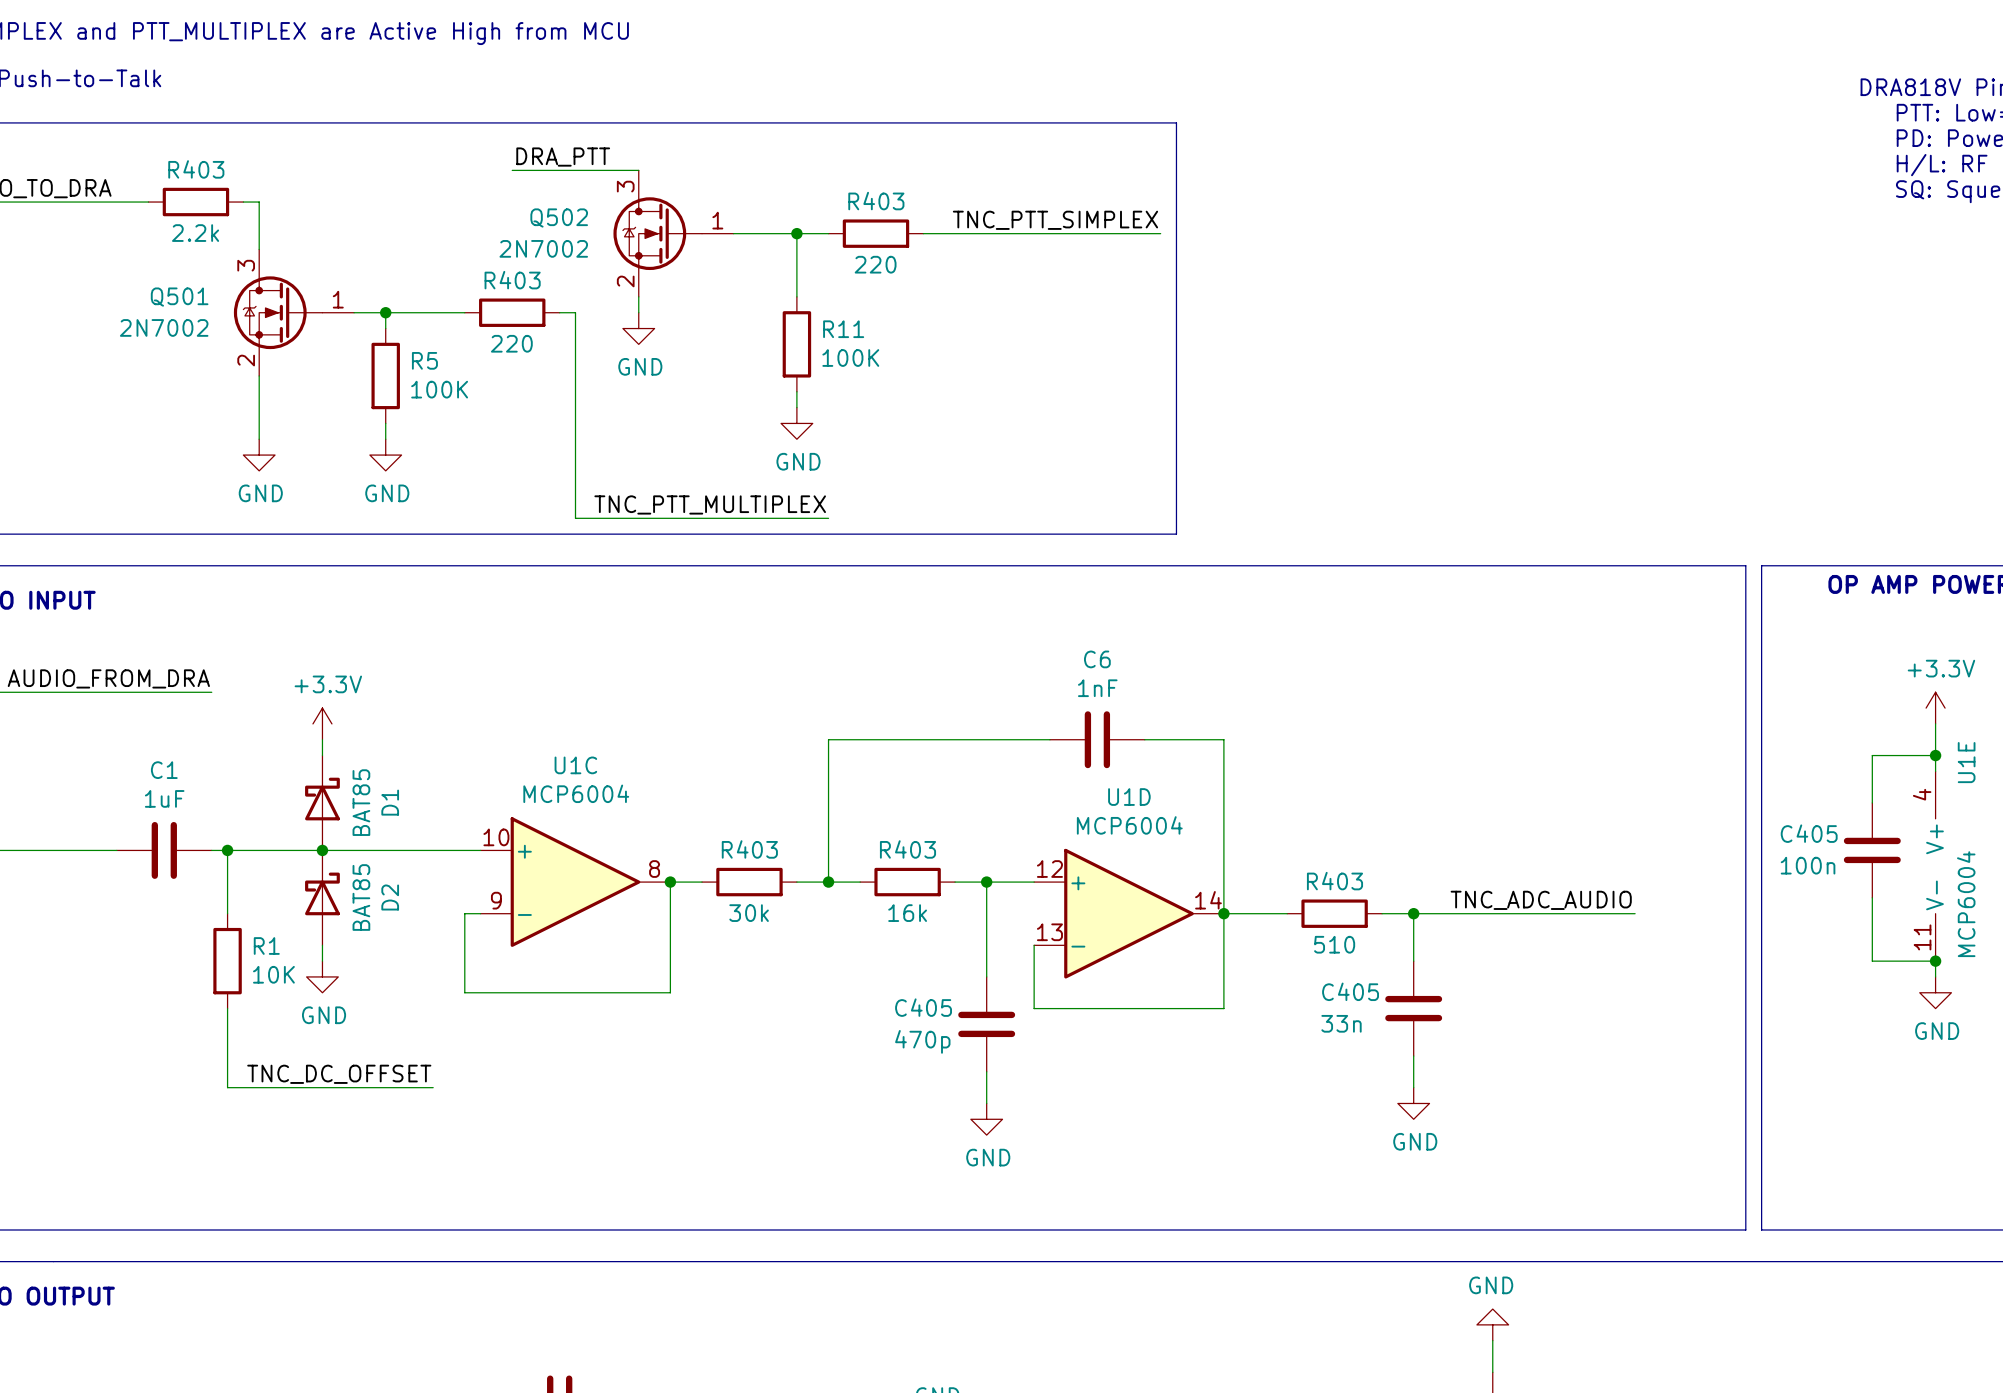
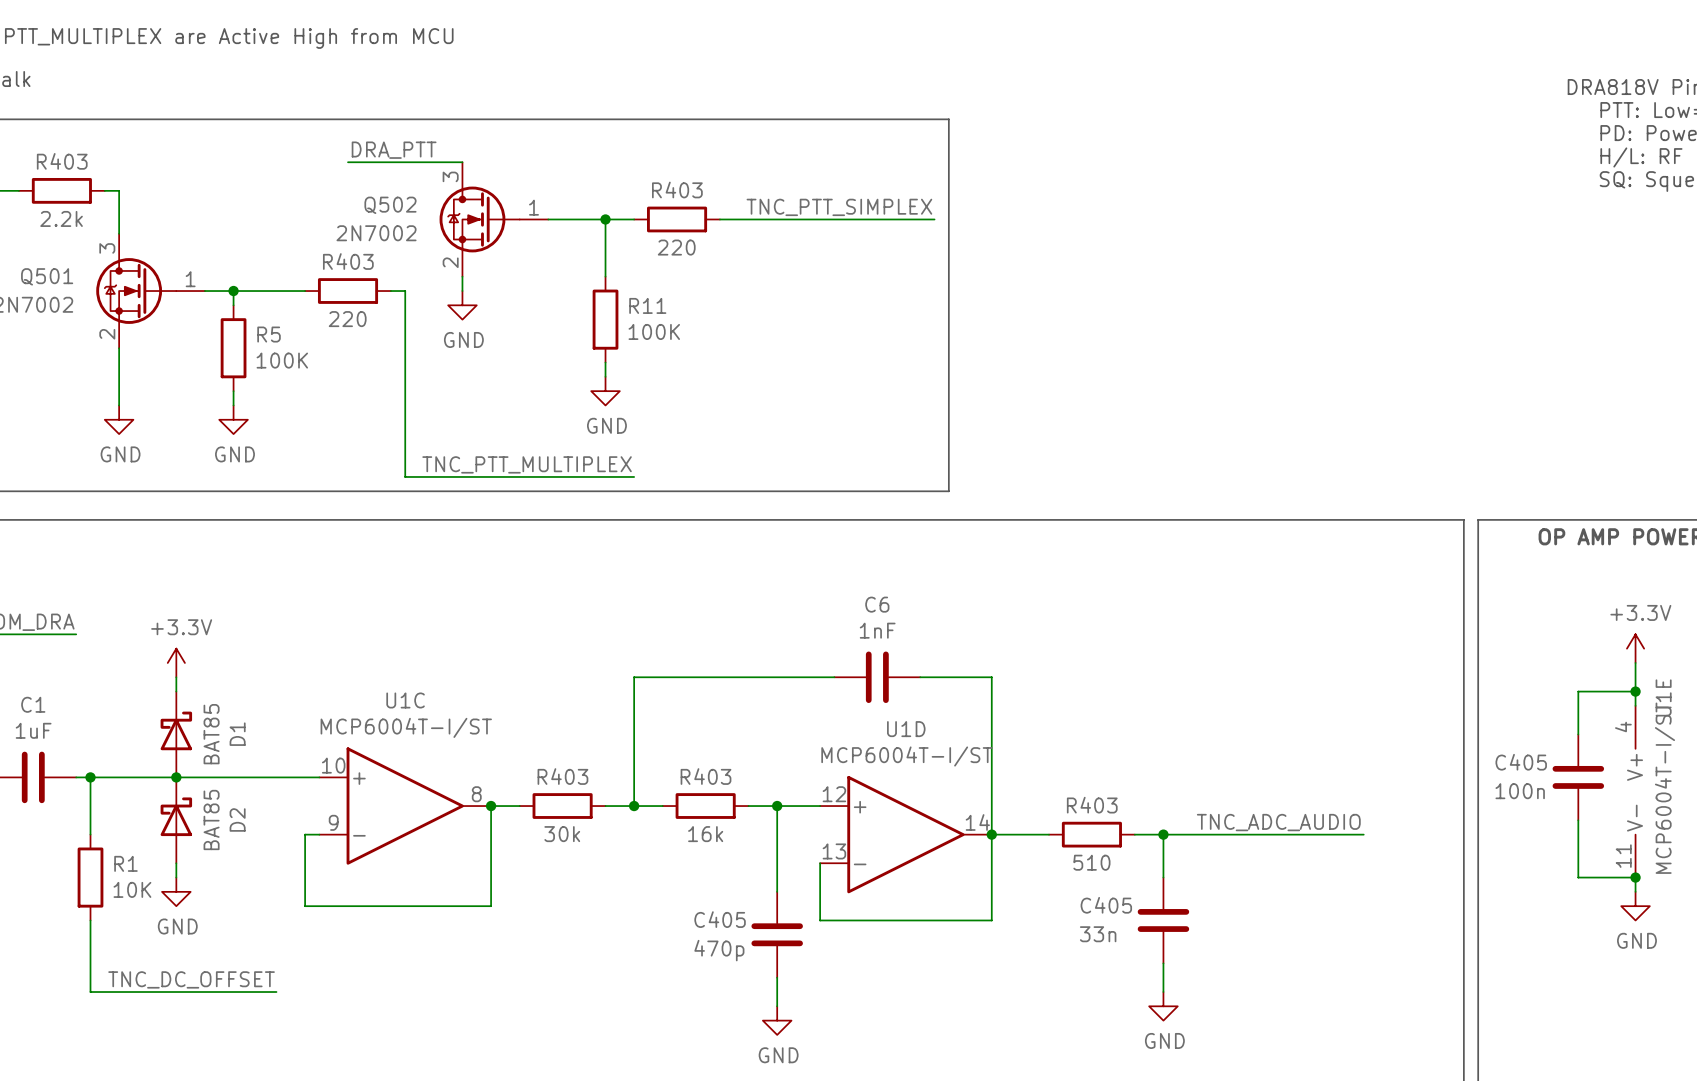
U1C value: MCP6004 (576, 793) -> MCP6004T-I/ST (406, 727)
U1D value: MCP6004 (1129, 825) -> MCP6004T-I/ST (906, 756)
U1E value: MCP6004 (1966, 904) -> MCP6004T-I/ST (1664, 788)

